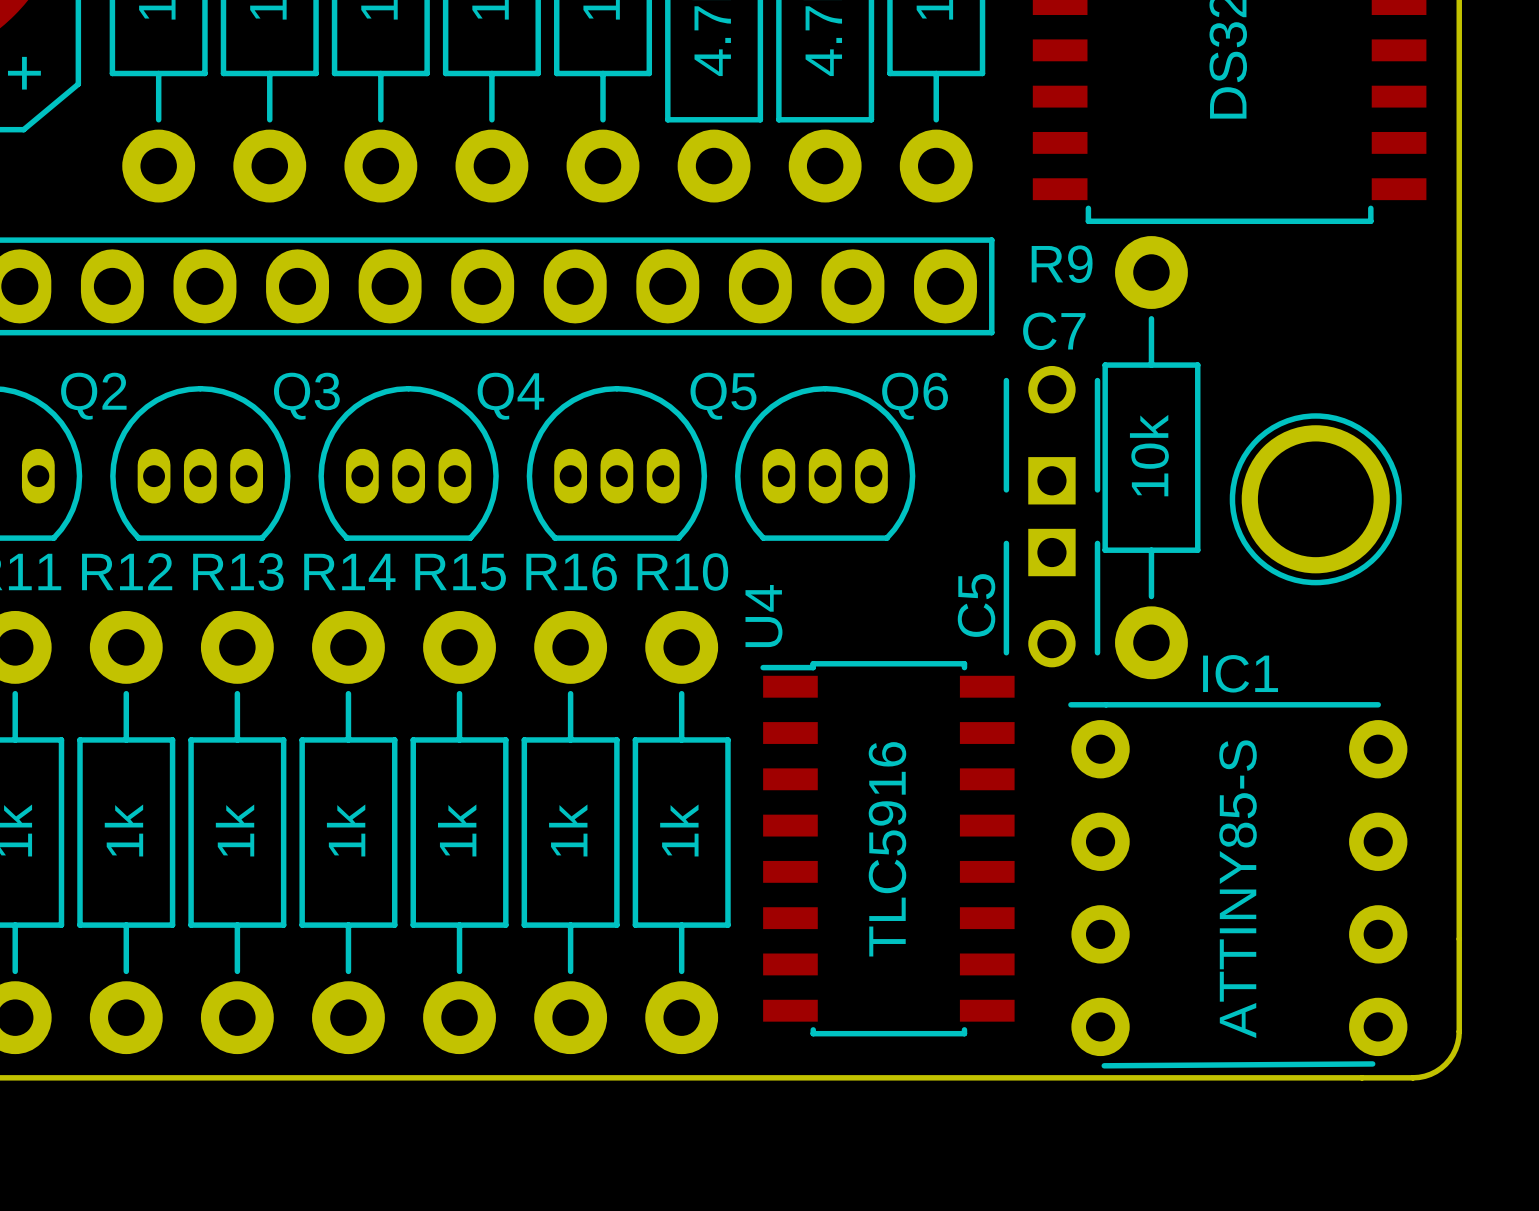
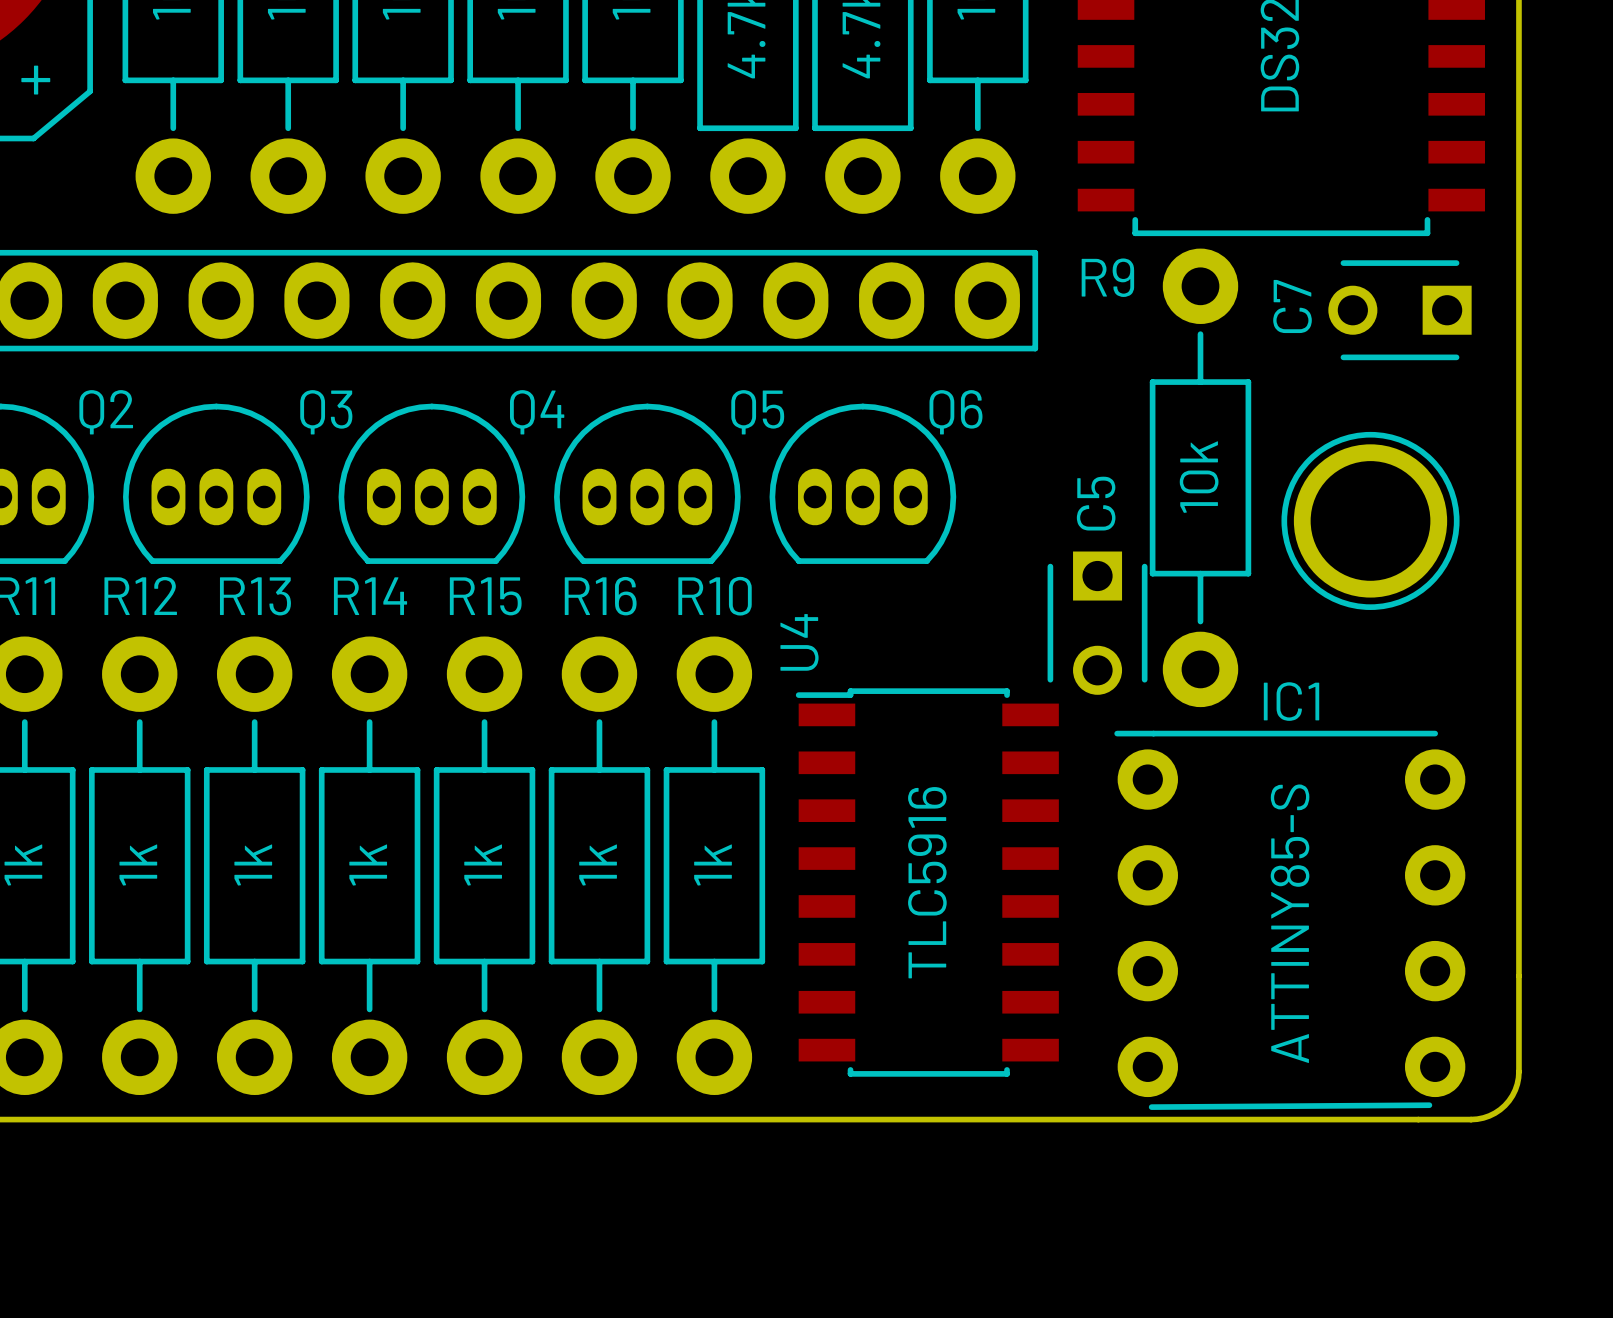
C7 rotation: 0° (1051, 435) -> 90° counterclockwise (1399, 310)
C7 position: (1051, 435) -> (1399, 310)
C5 name position: C5 (976, 605) -> C5 (1096, 503)

